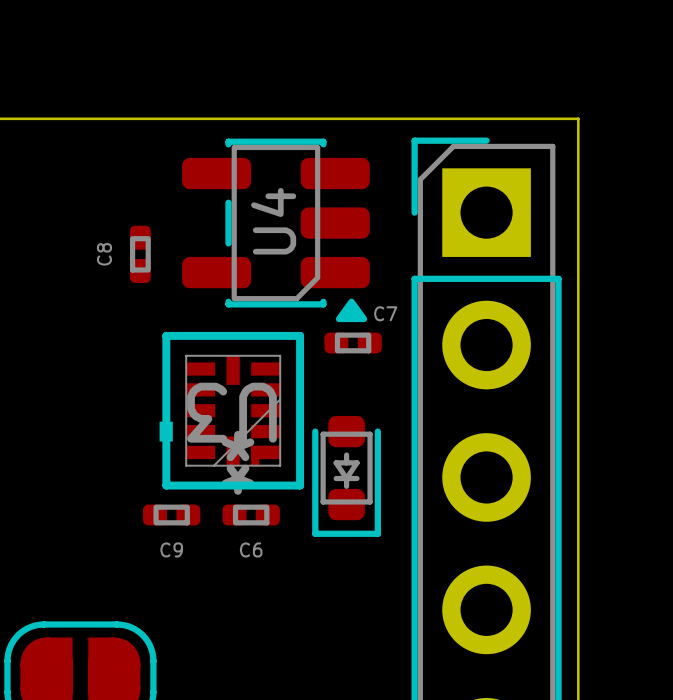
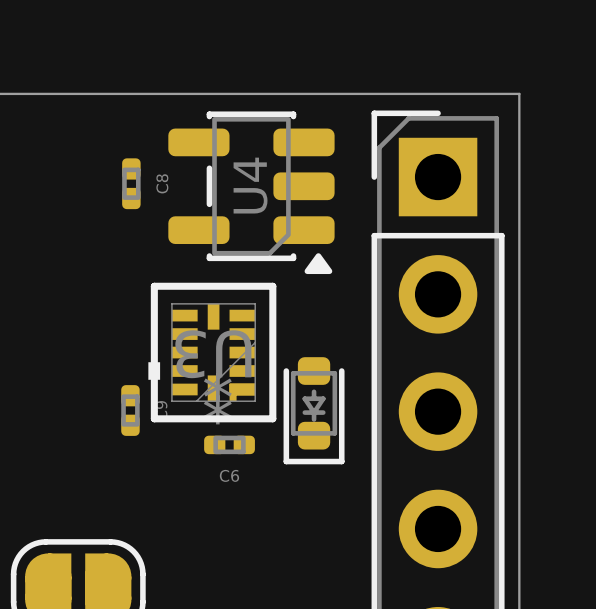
C8 name position: C8 (104, 254) -> C8 (162, 183)
C8 position: (140, 254) -> (131, 183)
C7: (353, 342) -> none
C9 rotation: 0° (171, 515) -> 90° clockwise (130, 410)
C9 position: (171, 515) -> (130, 410)

